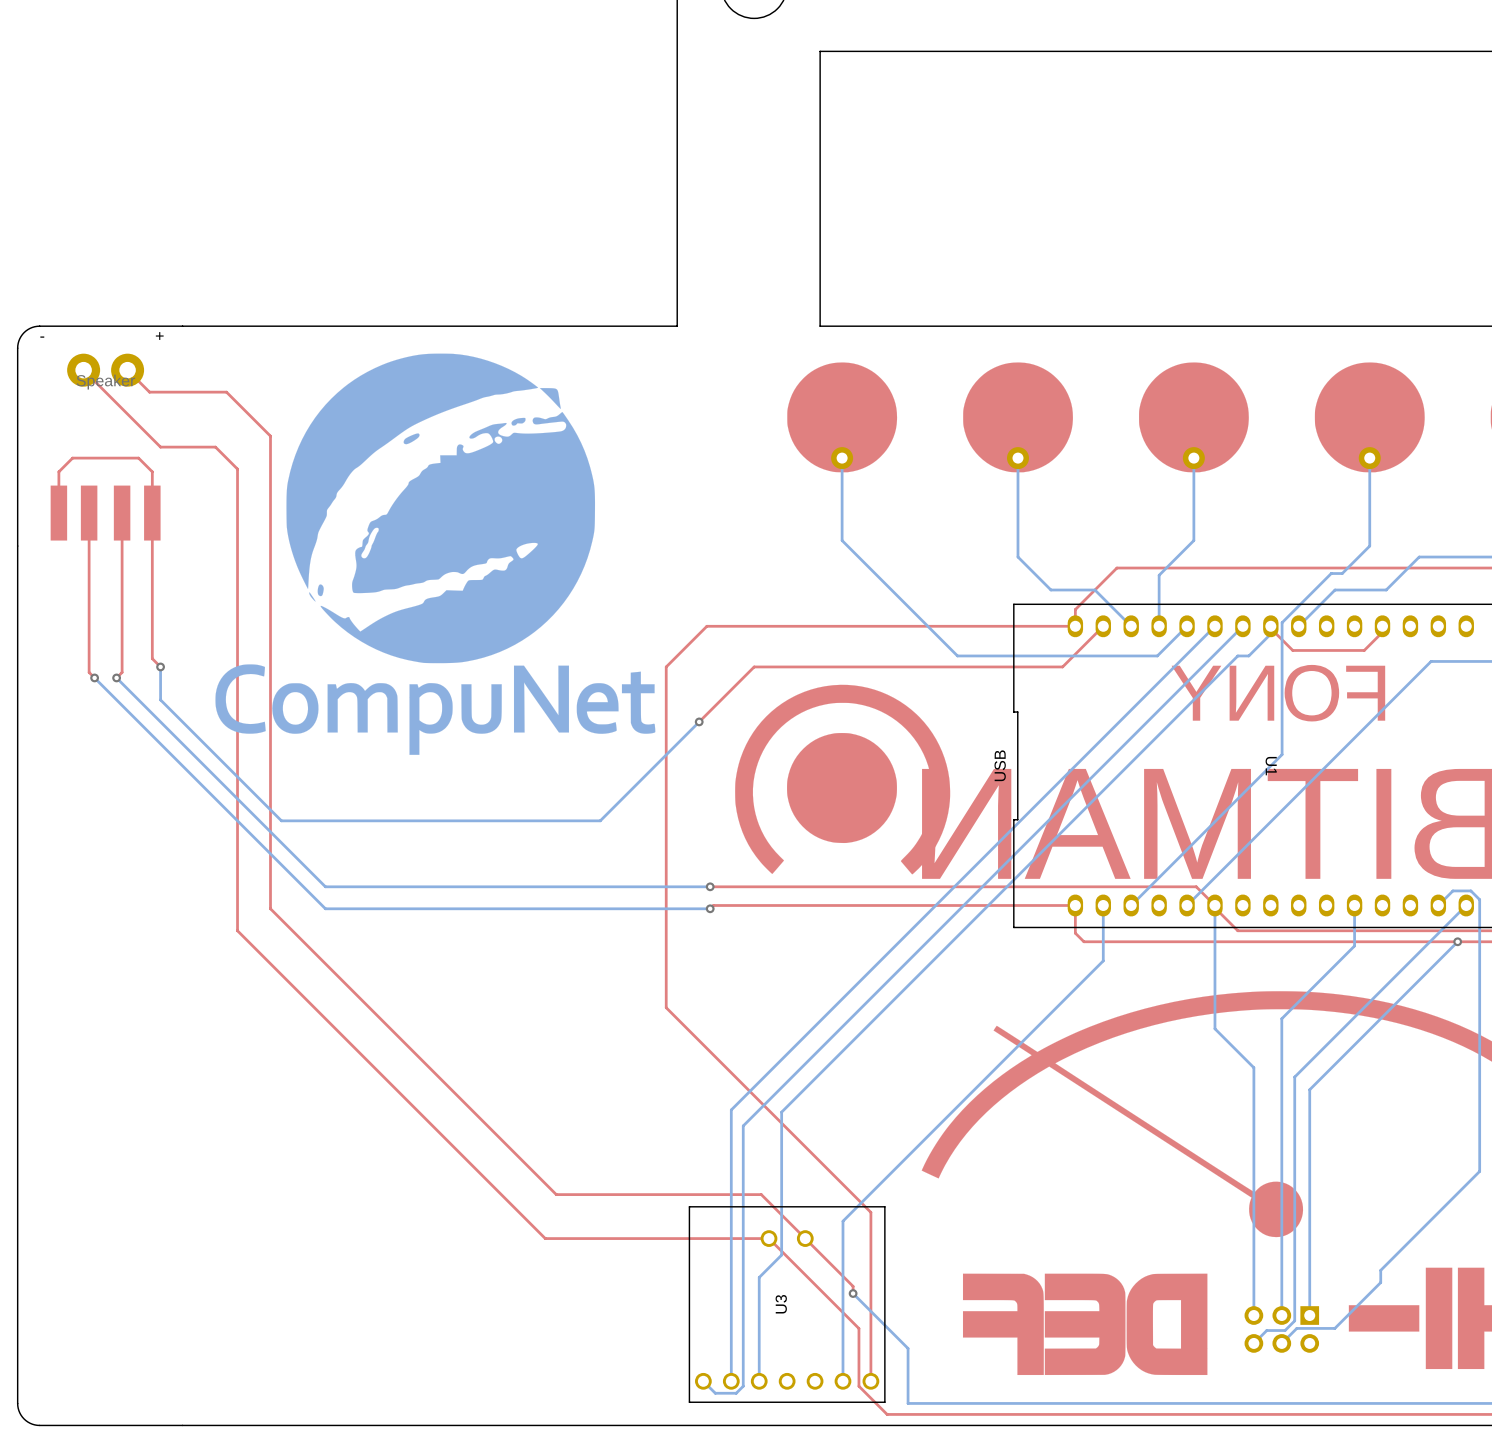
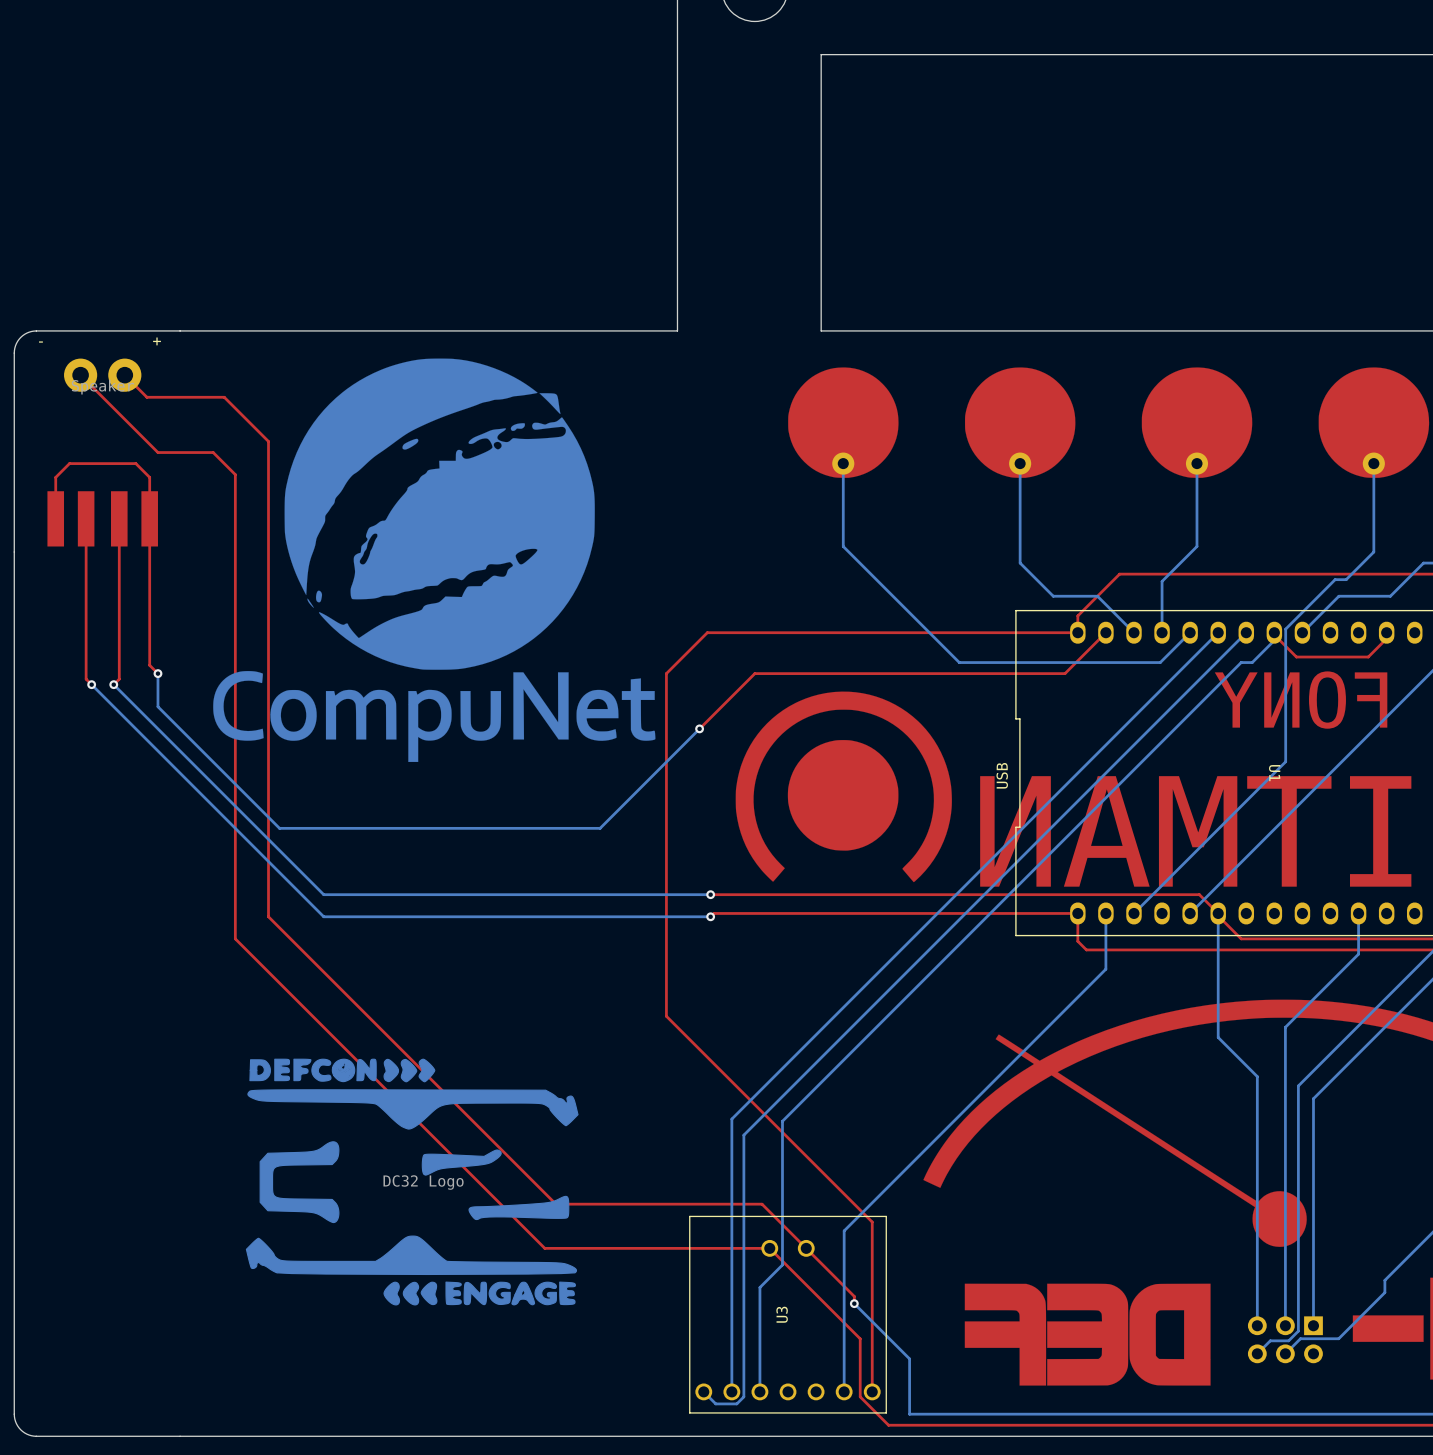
drawing: none -> [245, 1058, 579, 1306]

